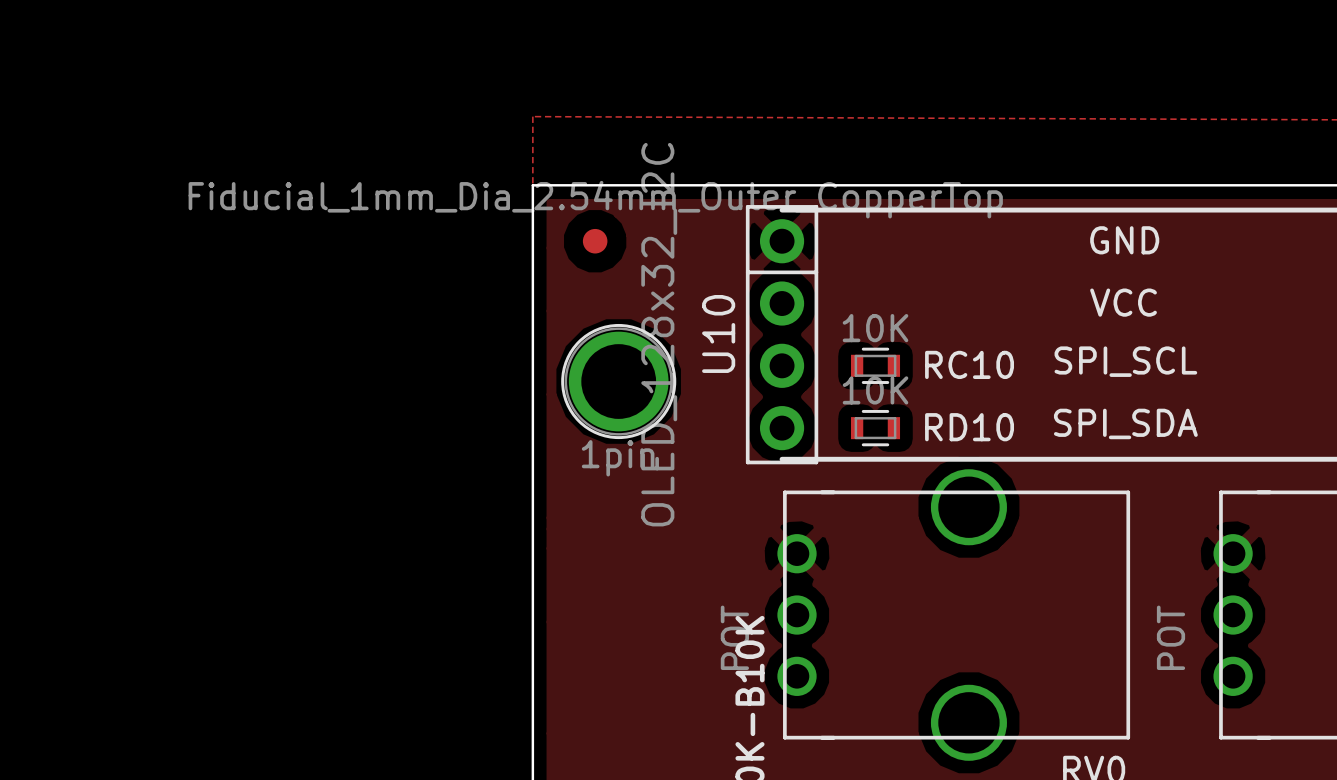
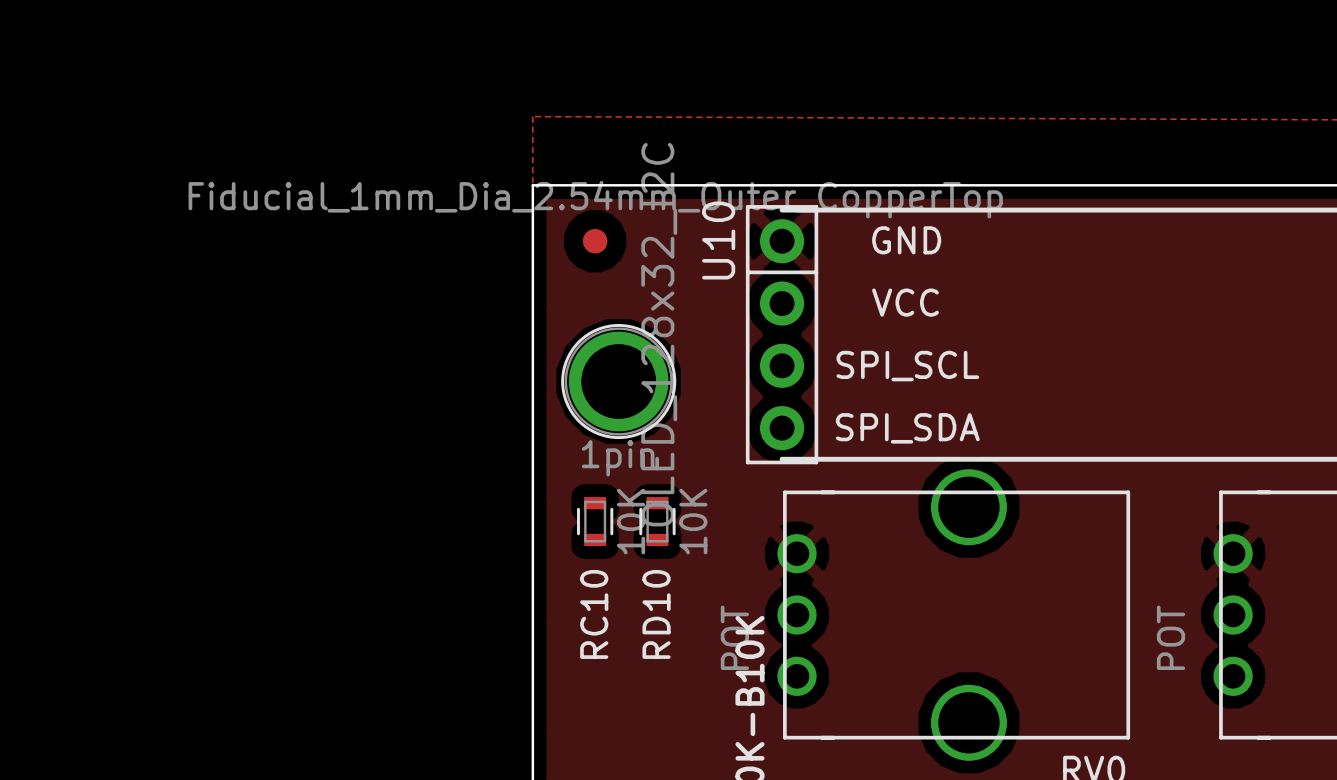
U10 text position: GND (1124, 240) -> GND (906, 240)
U10 text position: VCC (1123, 302) -> VCC (905, 302)
U10 name position: U10 (718, 333) -> U10 (718, 240)
U10 text position: SPI_SCL (1125, 361) -> SPI_SCL (907, 366)
RC10 rotation: 0° (875, 365) -> 90° clockwise (595, 521)
RC10 position: (875, 365) -> (595, 521)
U10 text position: SPI_SDA (1125, 423) -> SPI_SDA (907, 428)
RD10 rotation: 0° (875, 428) -> 90° clockwise (657, 521)
RD10 position: (875, 428) -> (657, 521)

